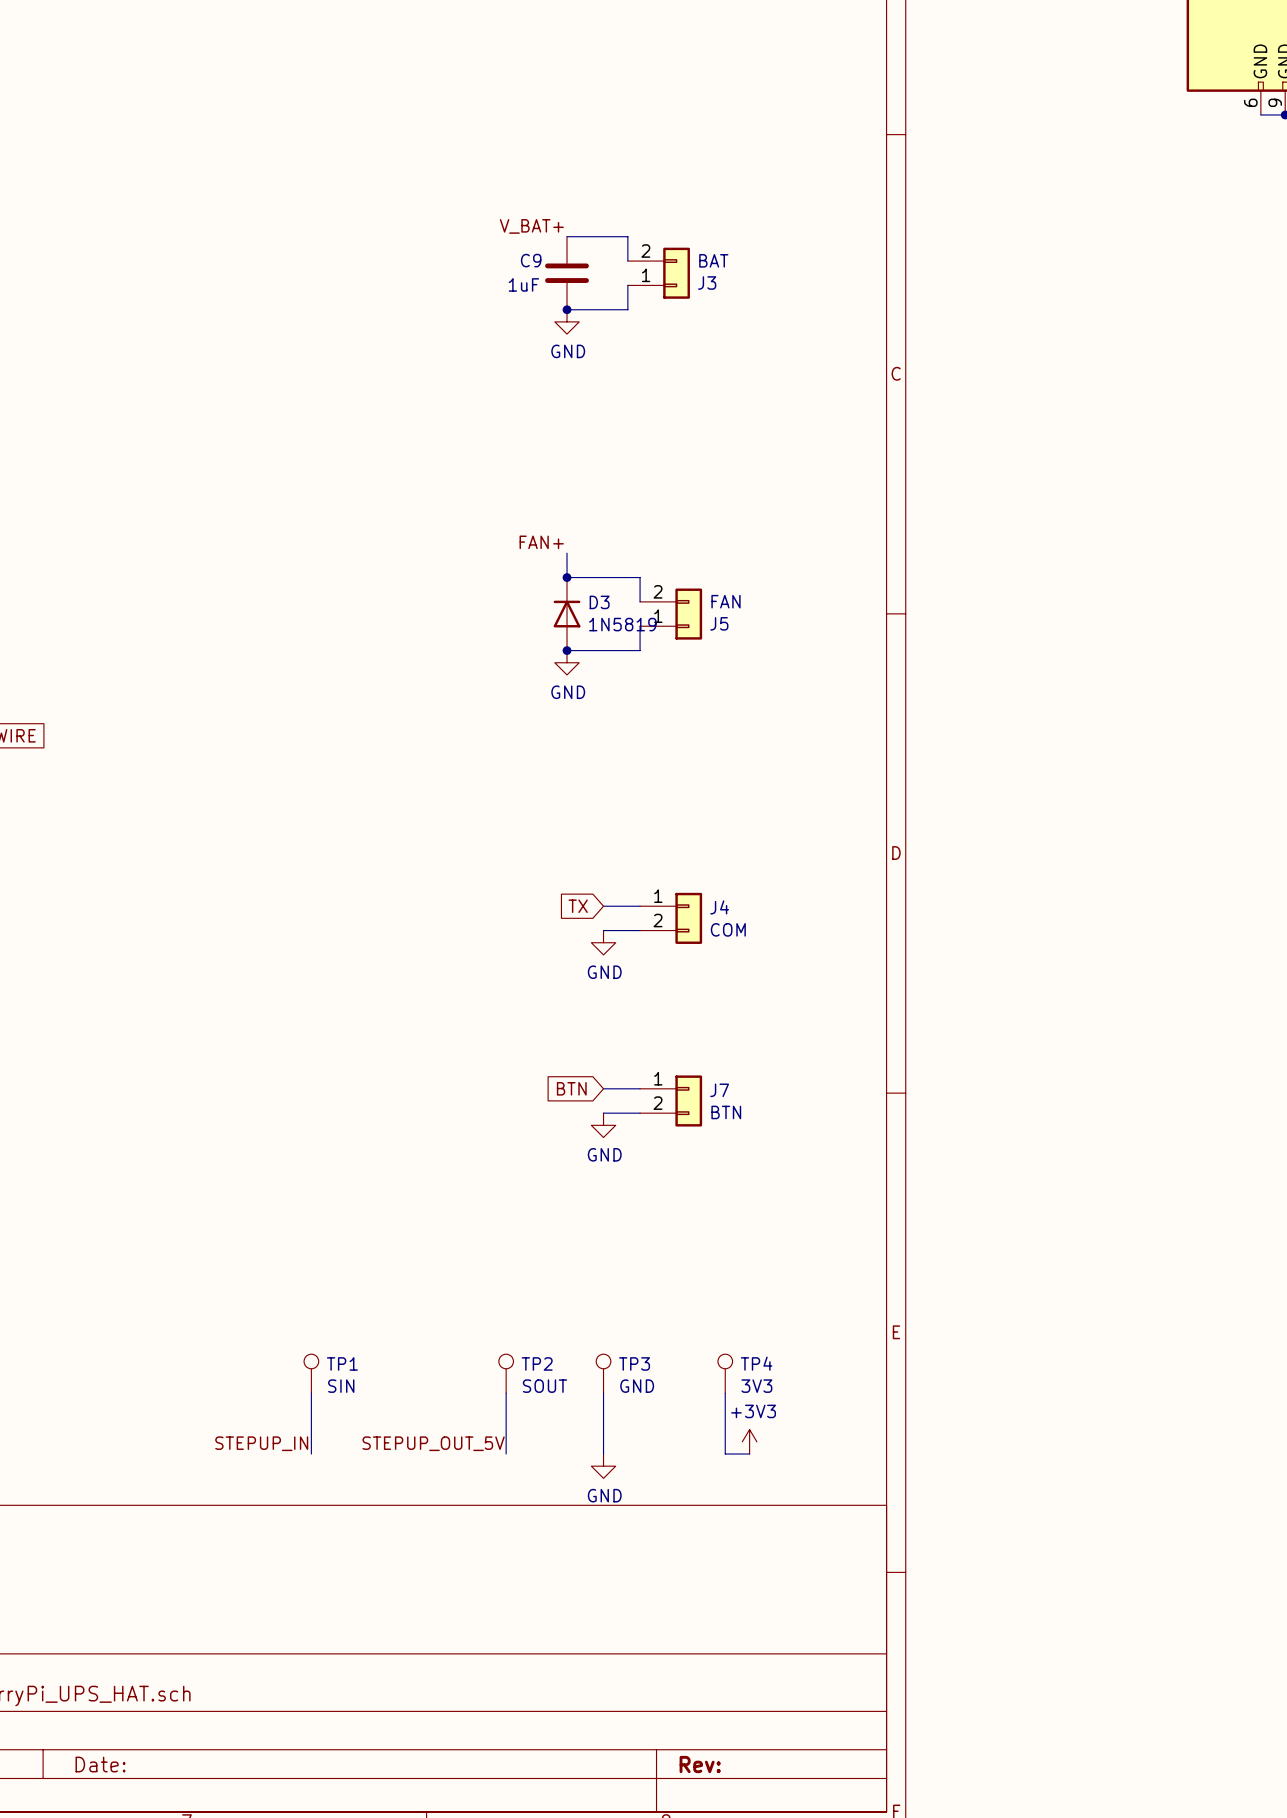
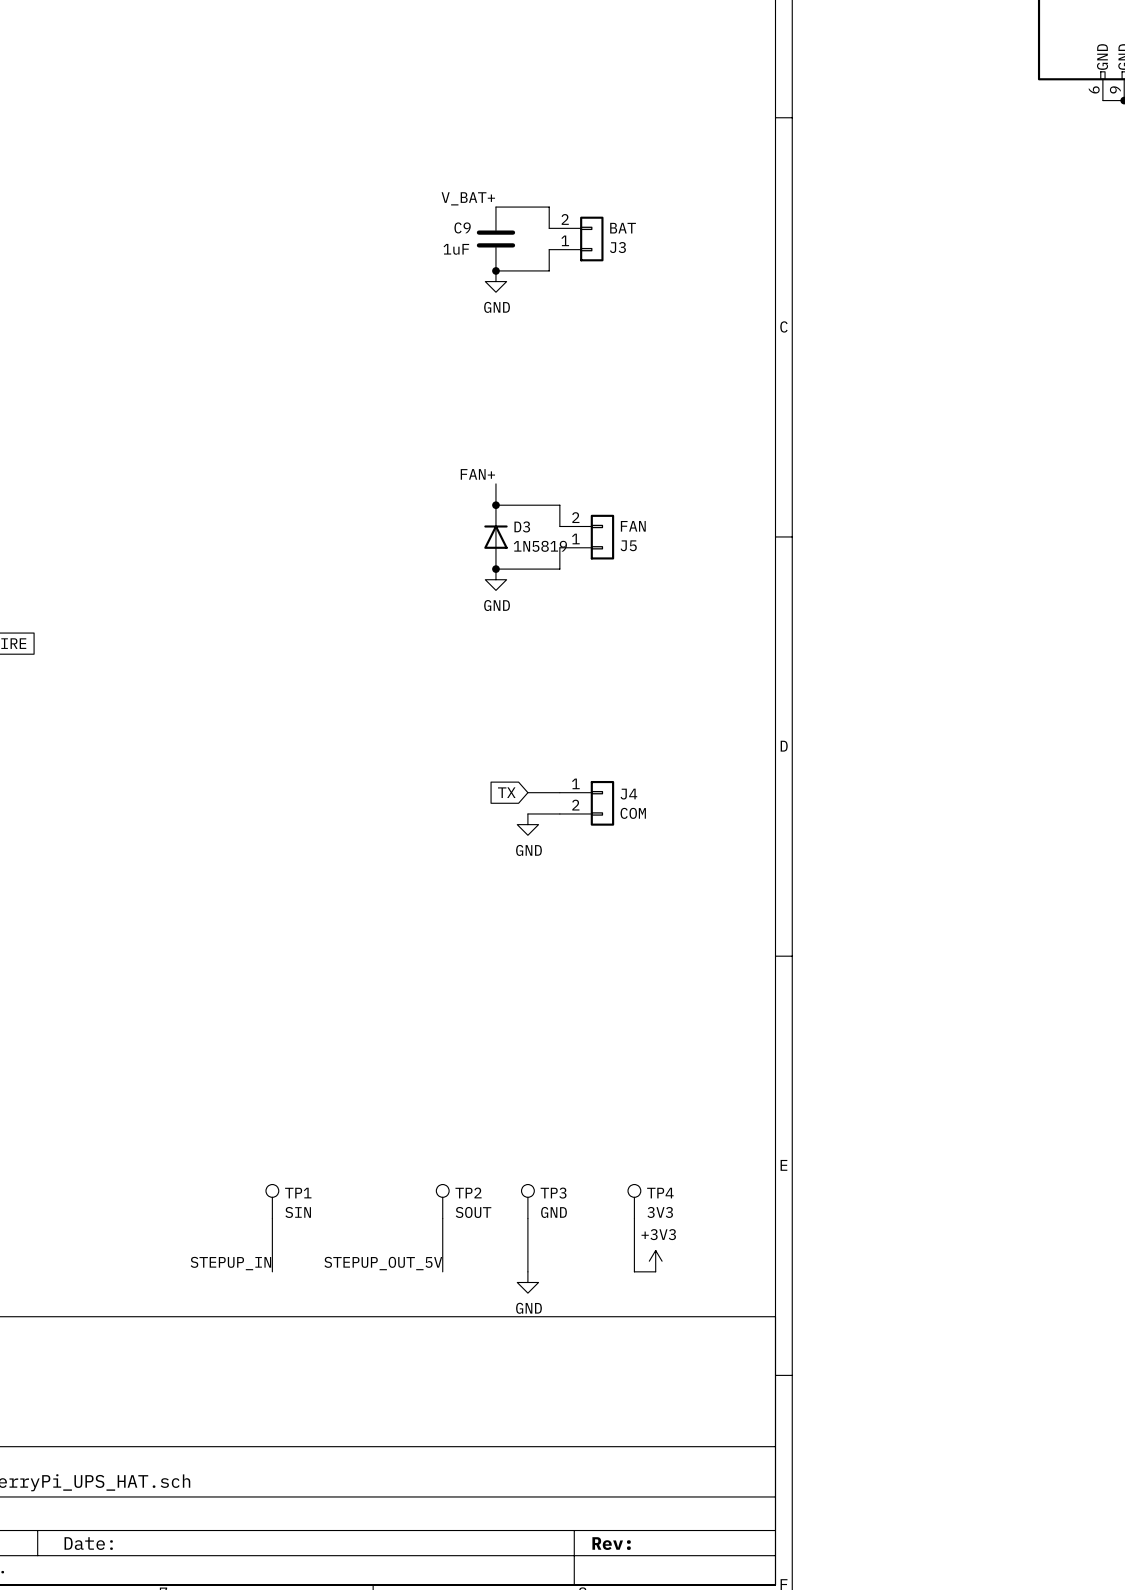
global label: BTN (571, 1088) -> none
wire: (603, 1088) (640, 1088) -> none
J7: BTN (671, 1100) -> none
wire: (603, 1113) (640, 1113) -> none
power symbol: GND (603, 1125) -> none

